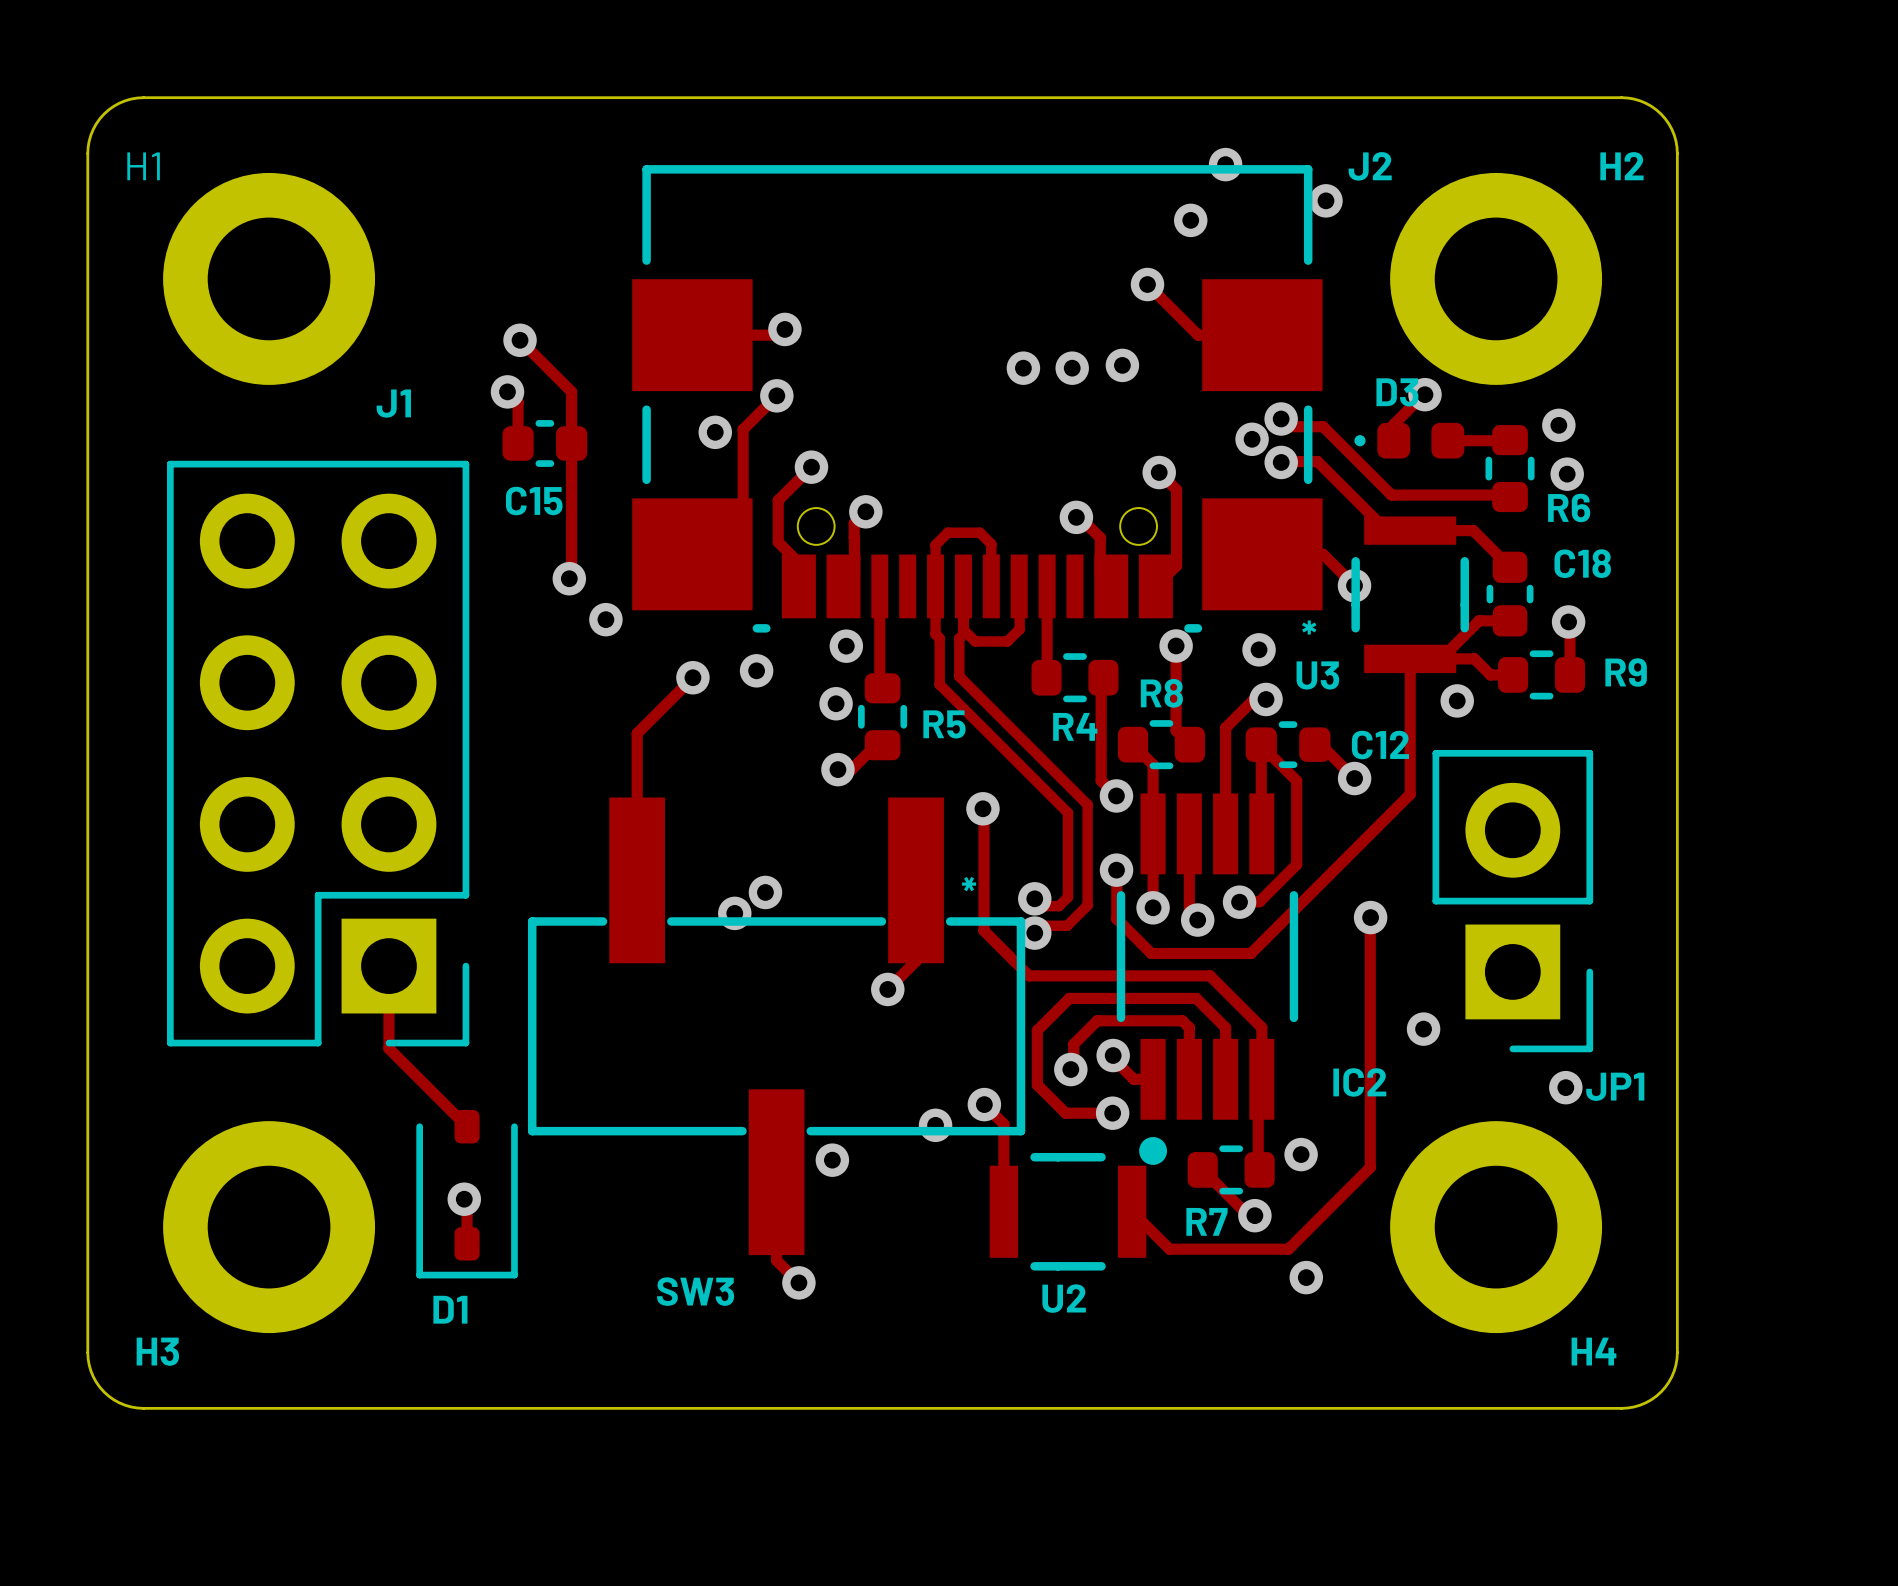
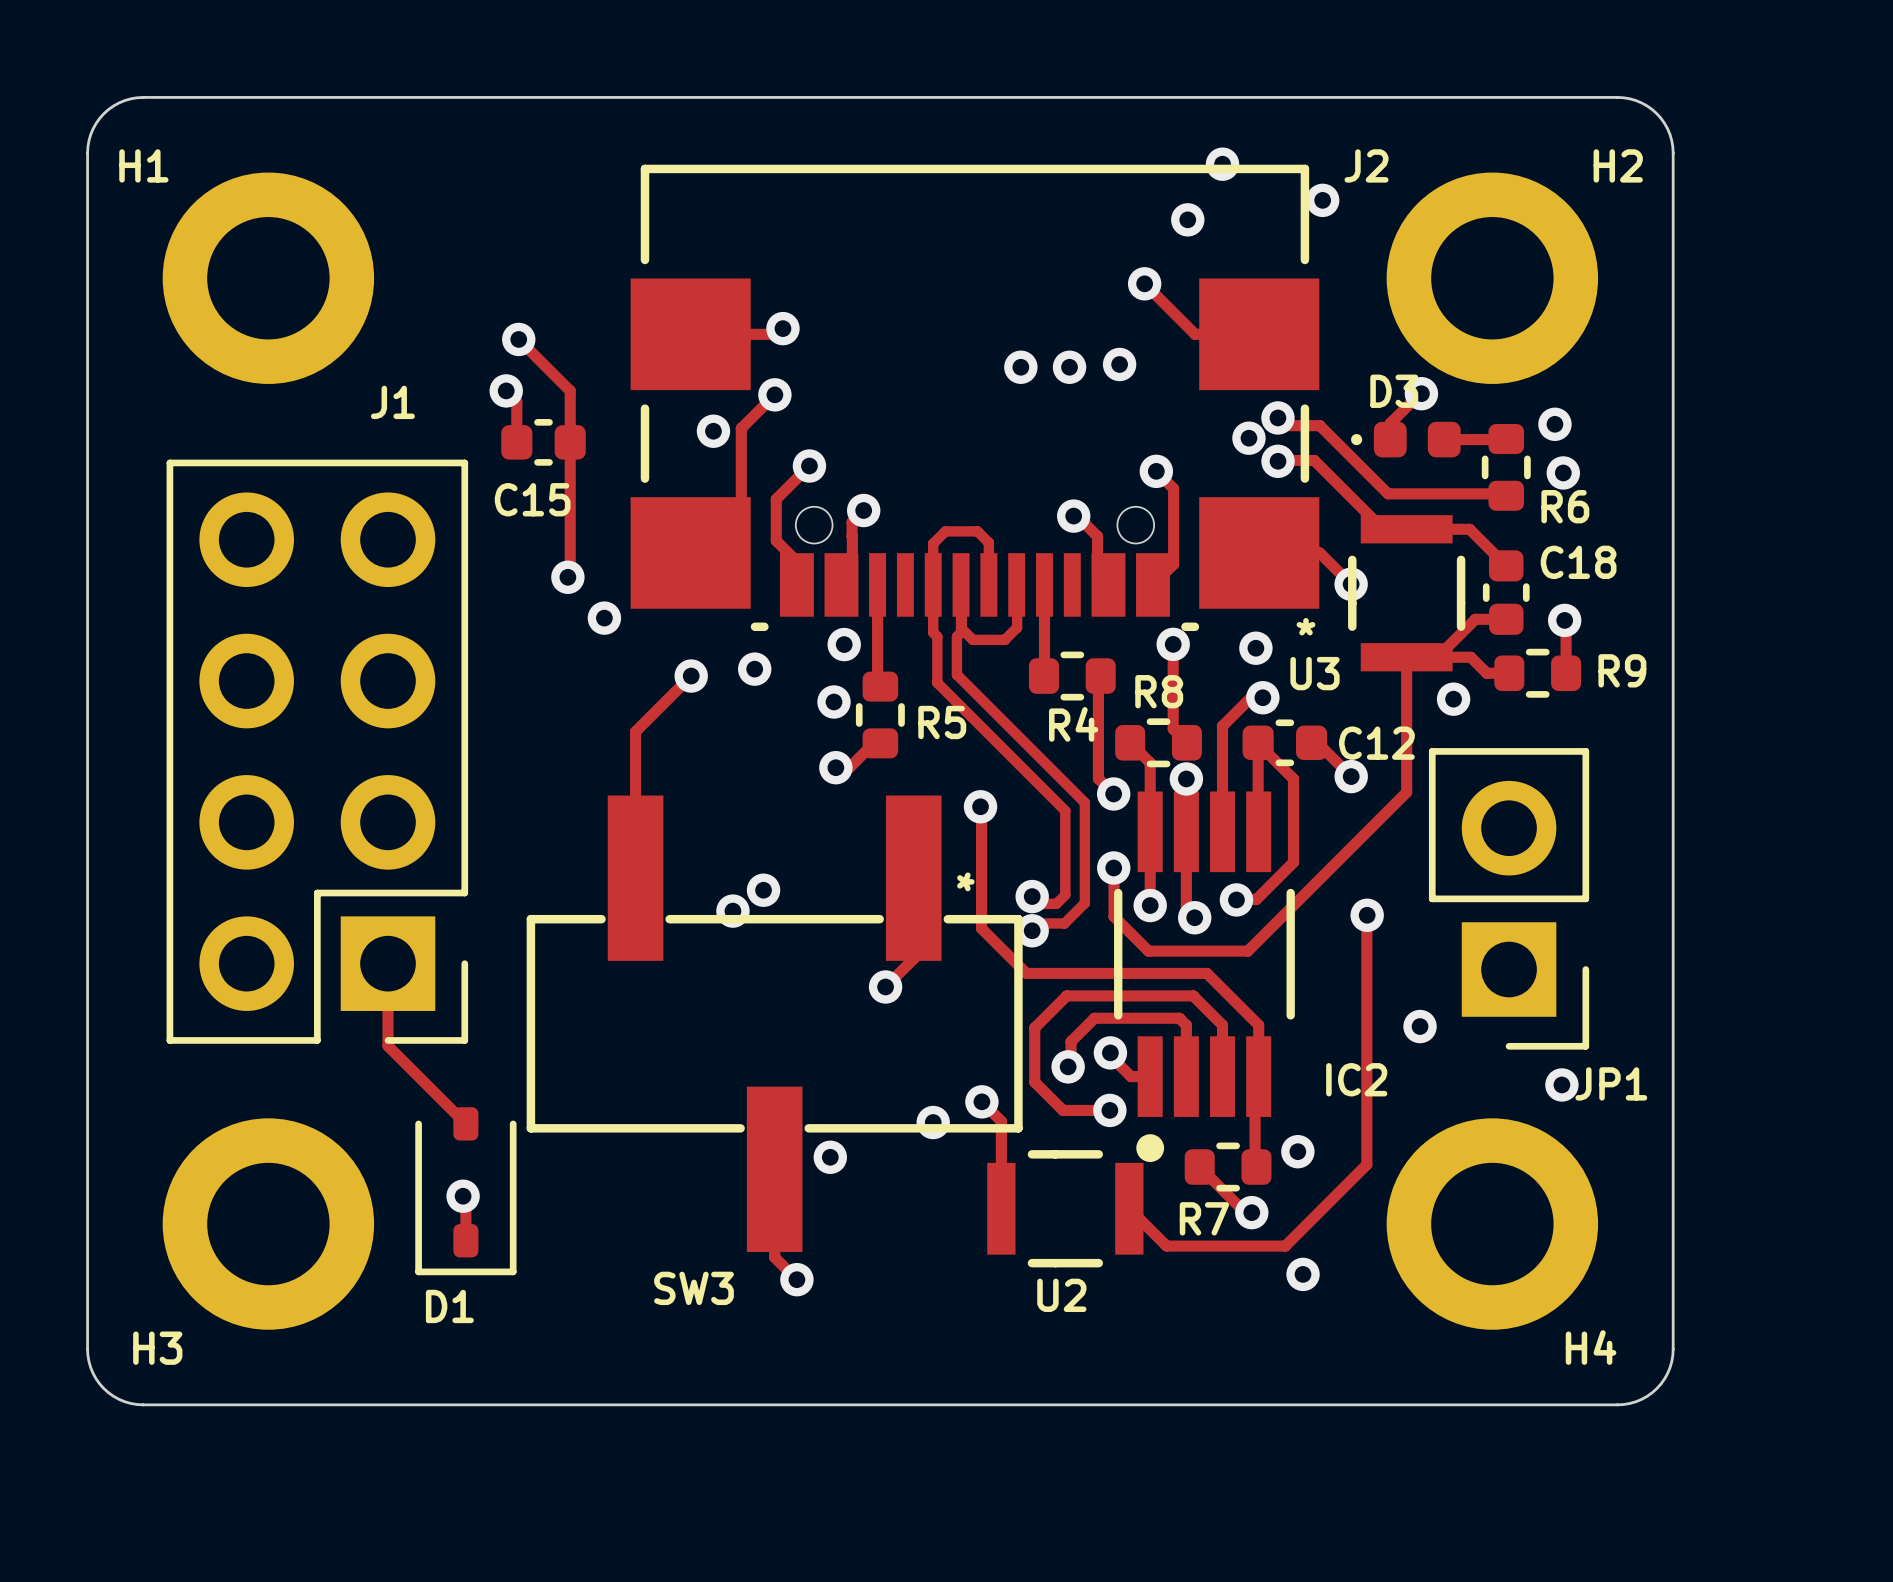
via: none -> (1186, 778)

